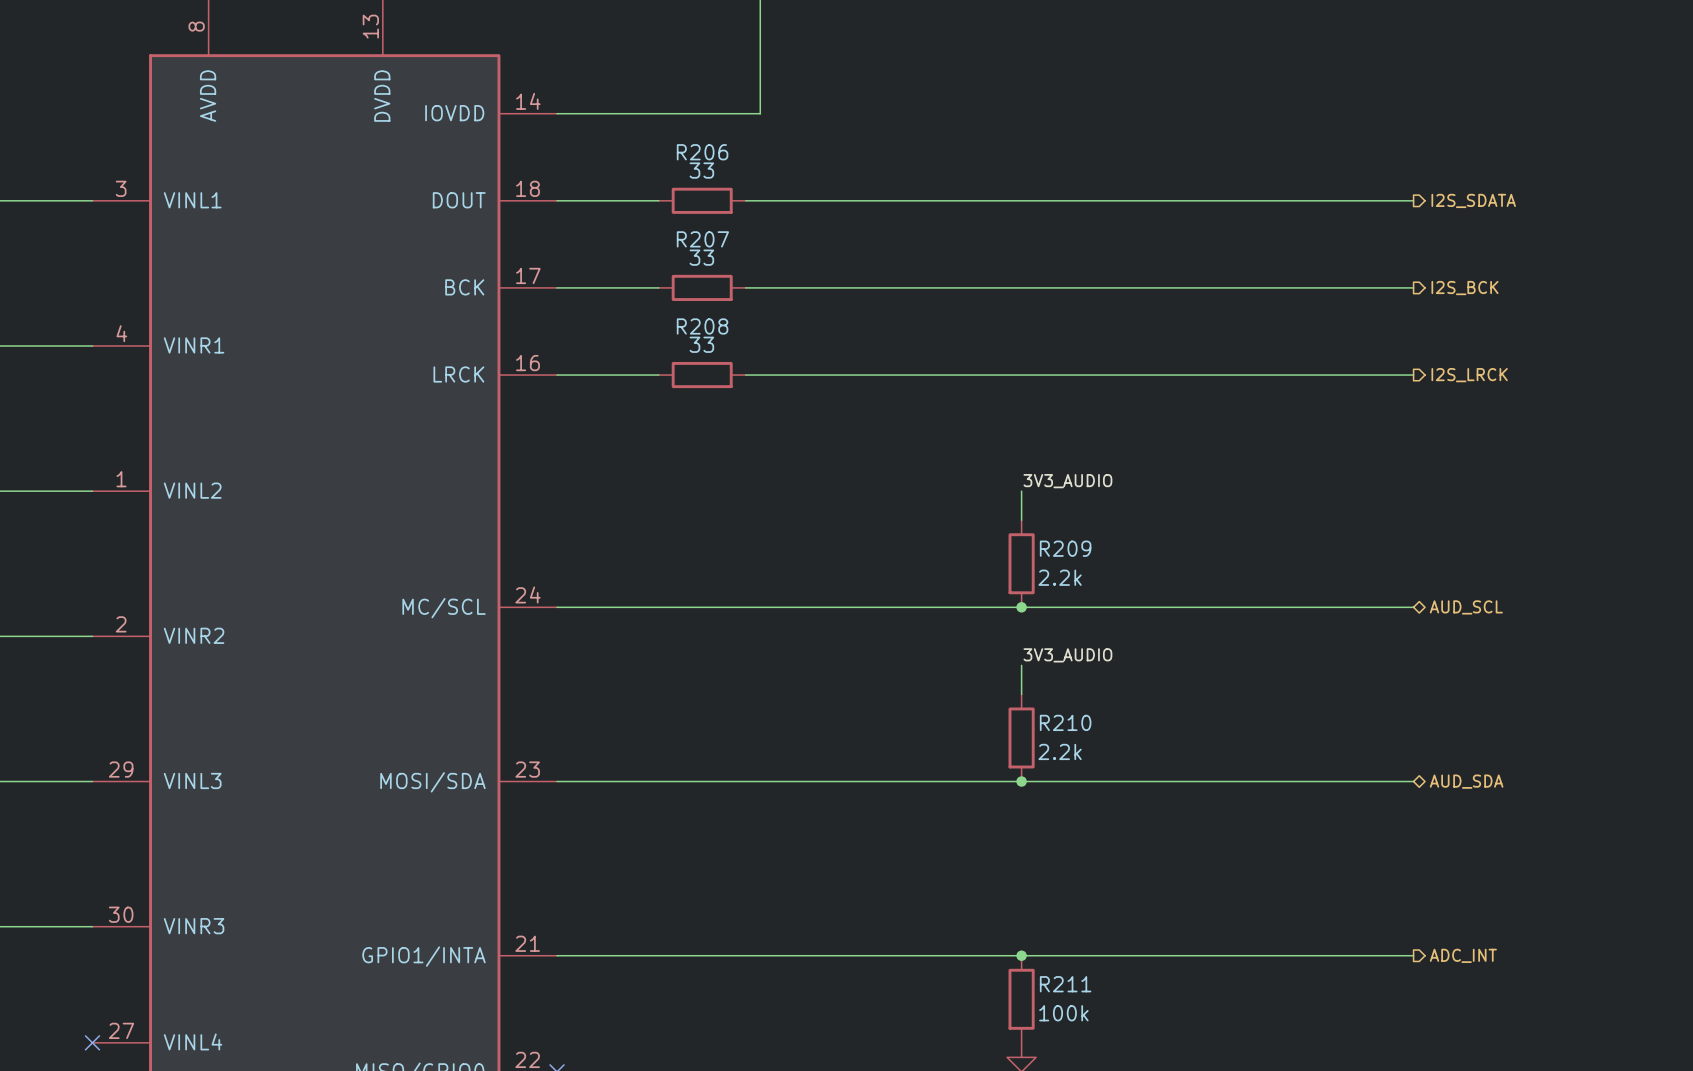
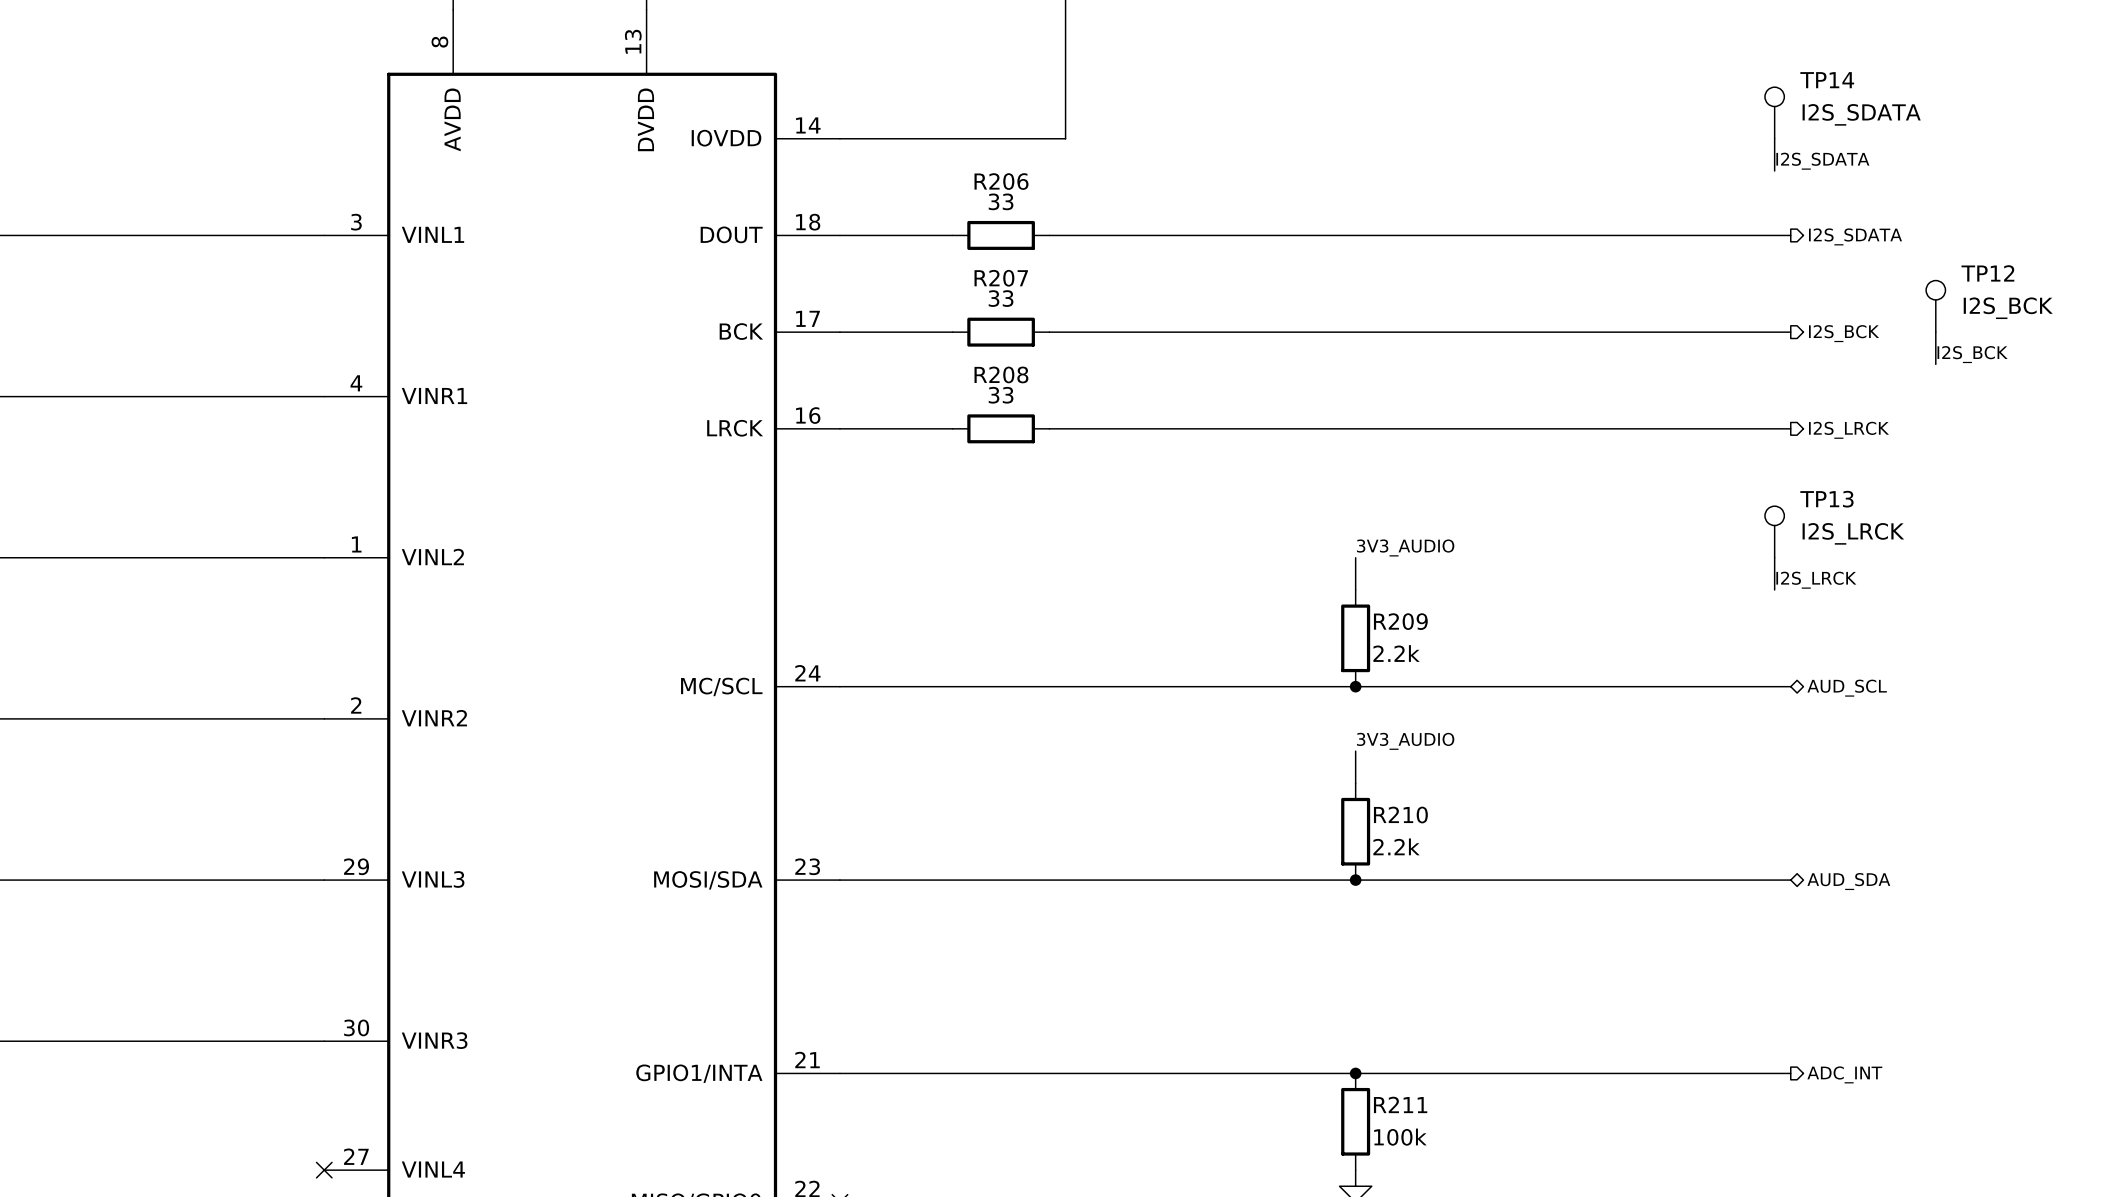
TP14: none -> I2S_SDATA (1774, 112)
wire: none -> (1774, 138) (1774, 170)
label: none -> I2S_SDATA (1822, 161)
TP12: none -> I2S_BCK (1935, 306)
wire: none -> (1935, 332) (1935, 364)
label: none -> I2S_BCK (1972, 354)
TP13: none -> I2S_LRCK (1774, 531)
wire: none -> (1774, 557) (1774, 589)
label: none -> I2S_LRCK (1816, 580)

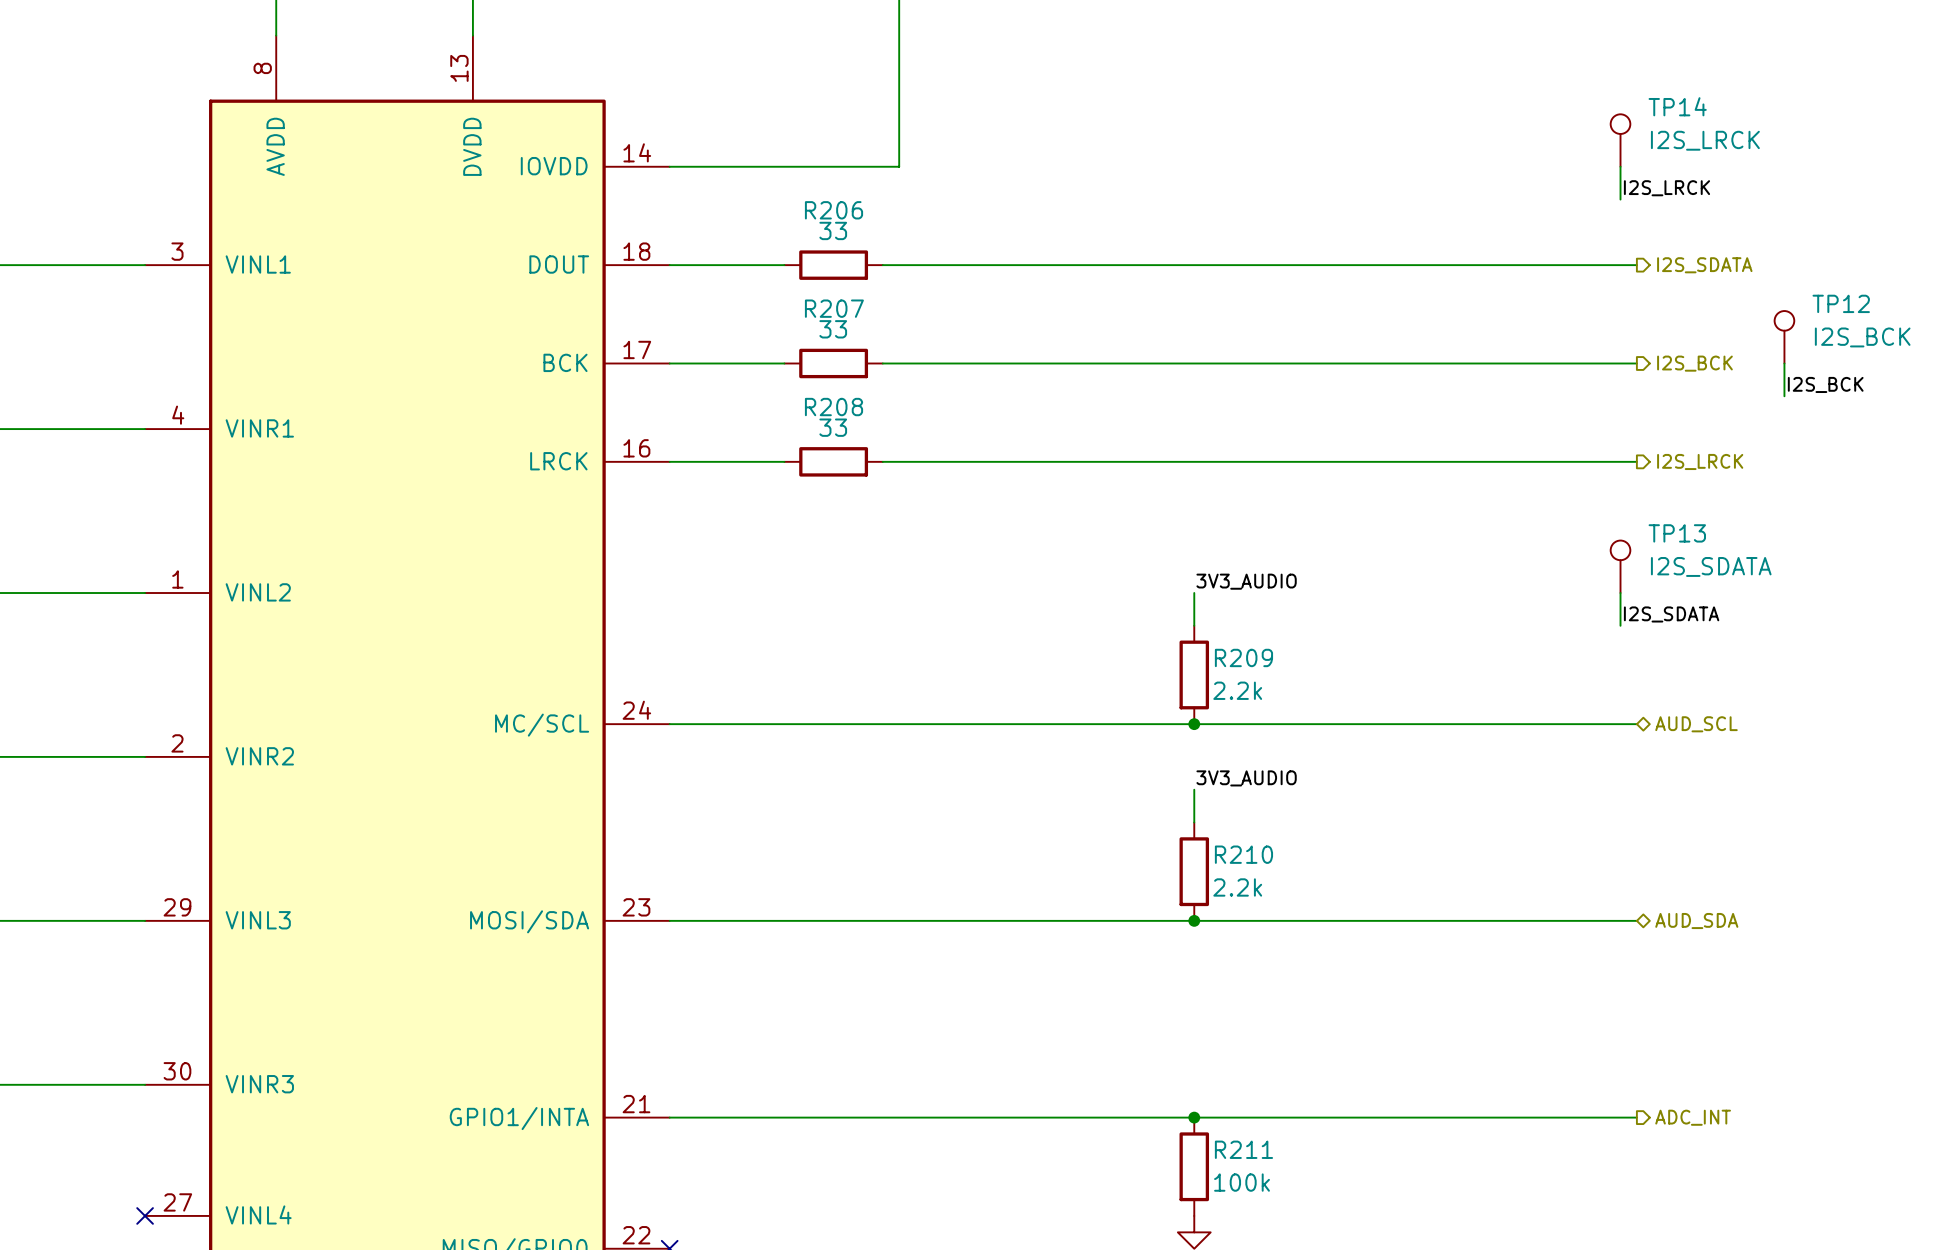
TP14 value: I2S_SDATA (1861, 114) -> I2S_LRCK (1705, 140)
label: I2S_SDATA (1822, 161) -> I2S_LRCK (1666, 188)
TP13 value: I2S_LRCK (1853, 533) -> I2S_SDATA (1711, 566)
label: I2S_LRCK (1816, 580) -> I2S_SDATA (1671, 614)

